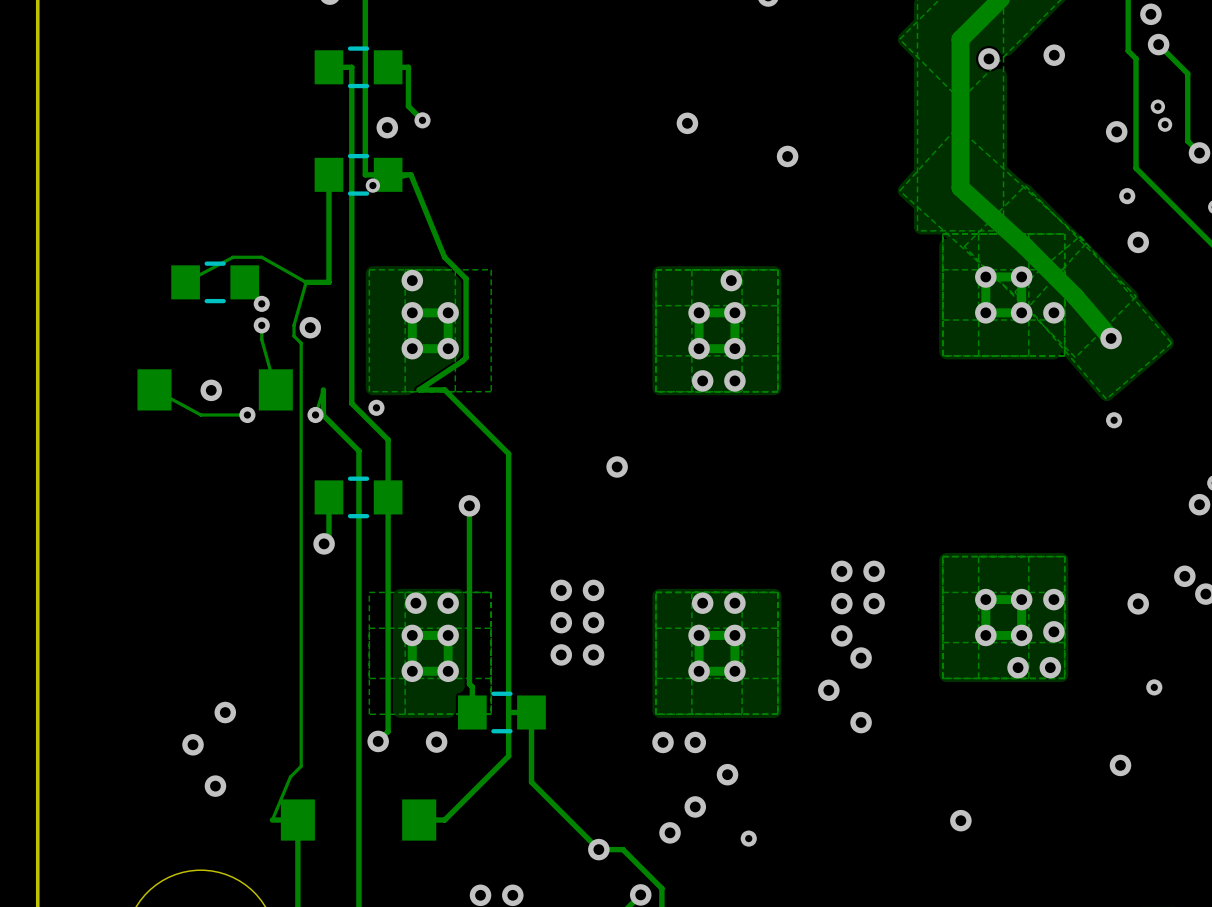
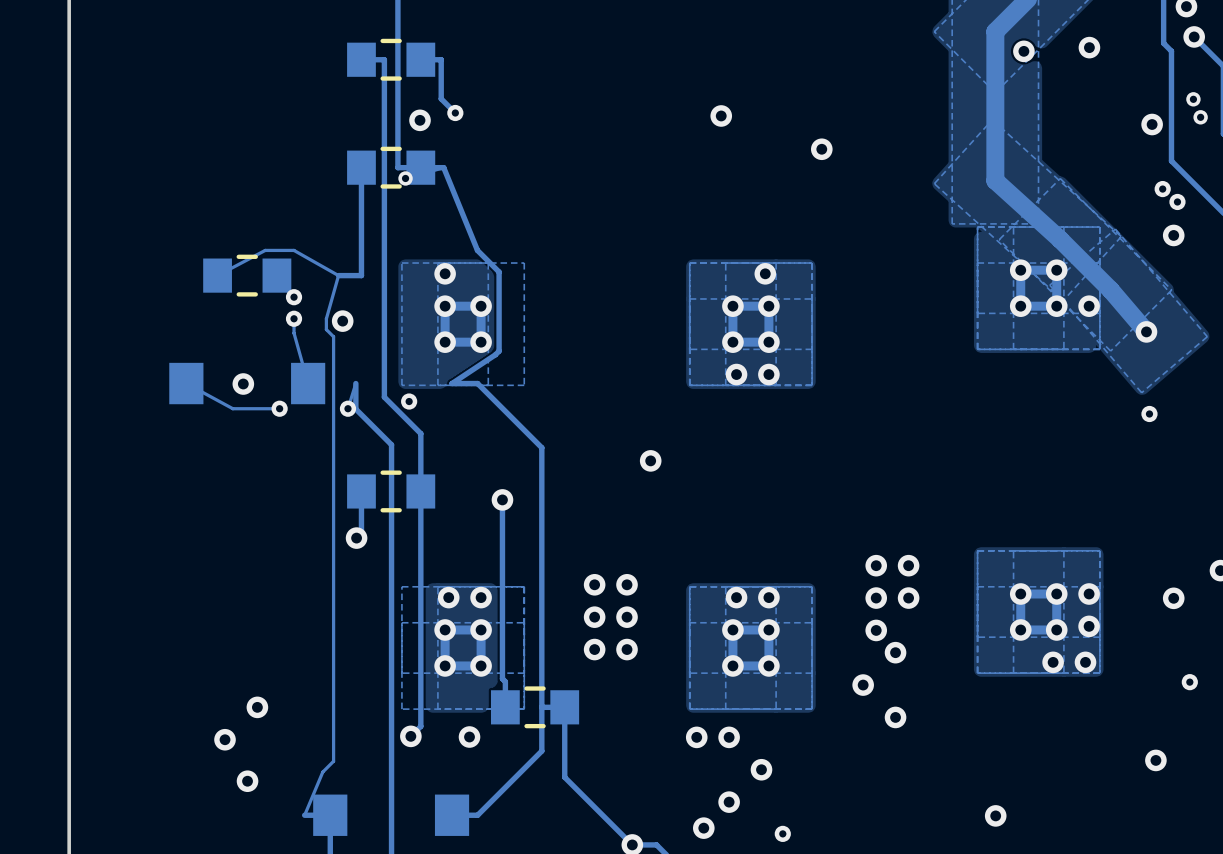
via: none -> (1177, 201)

